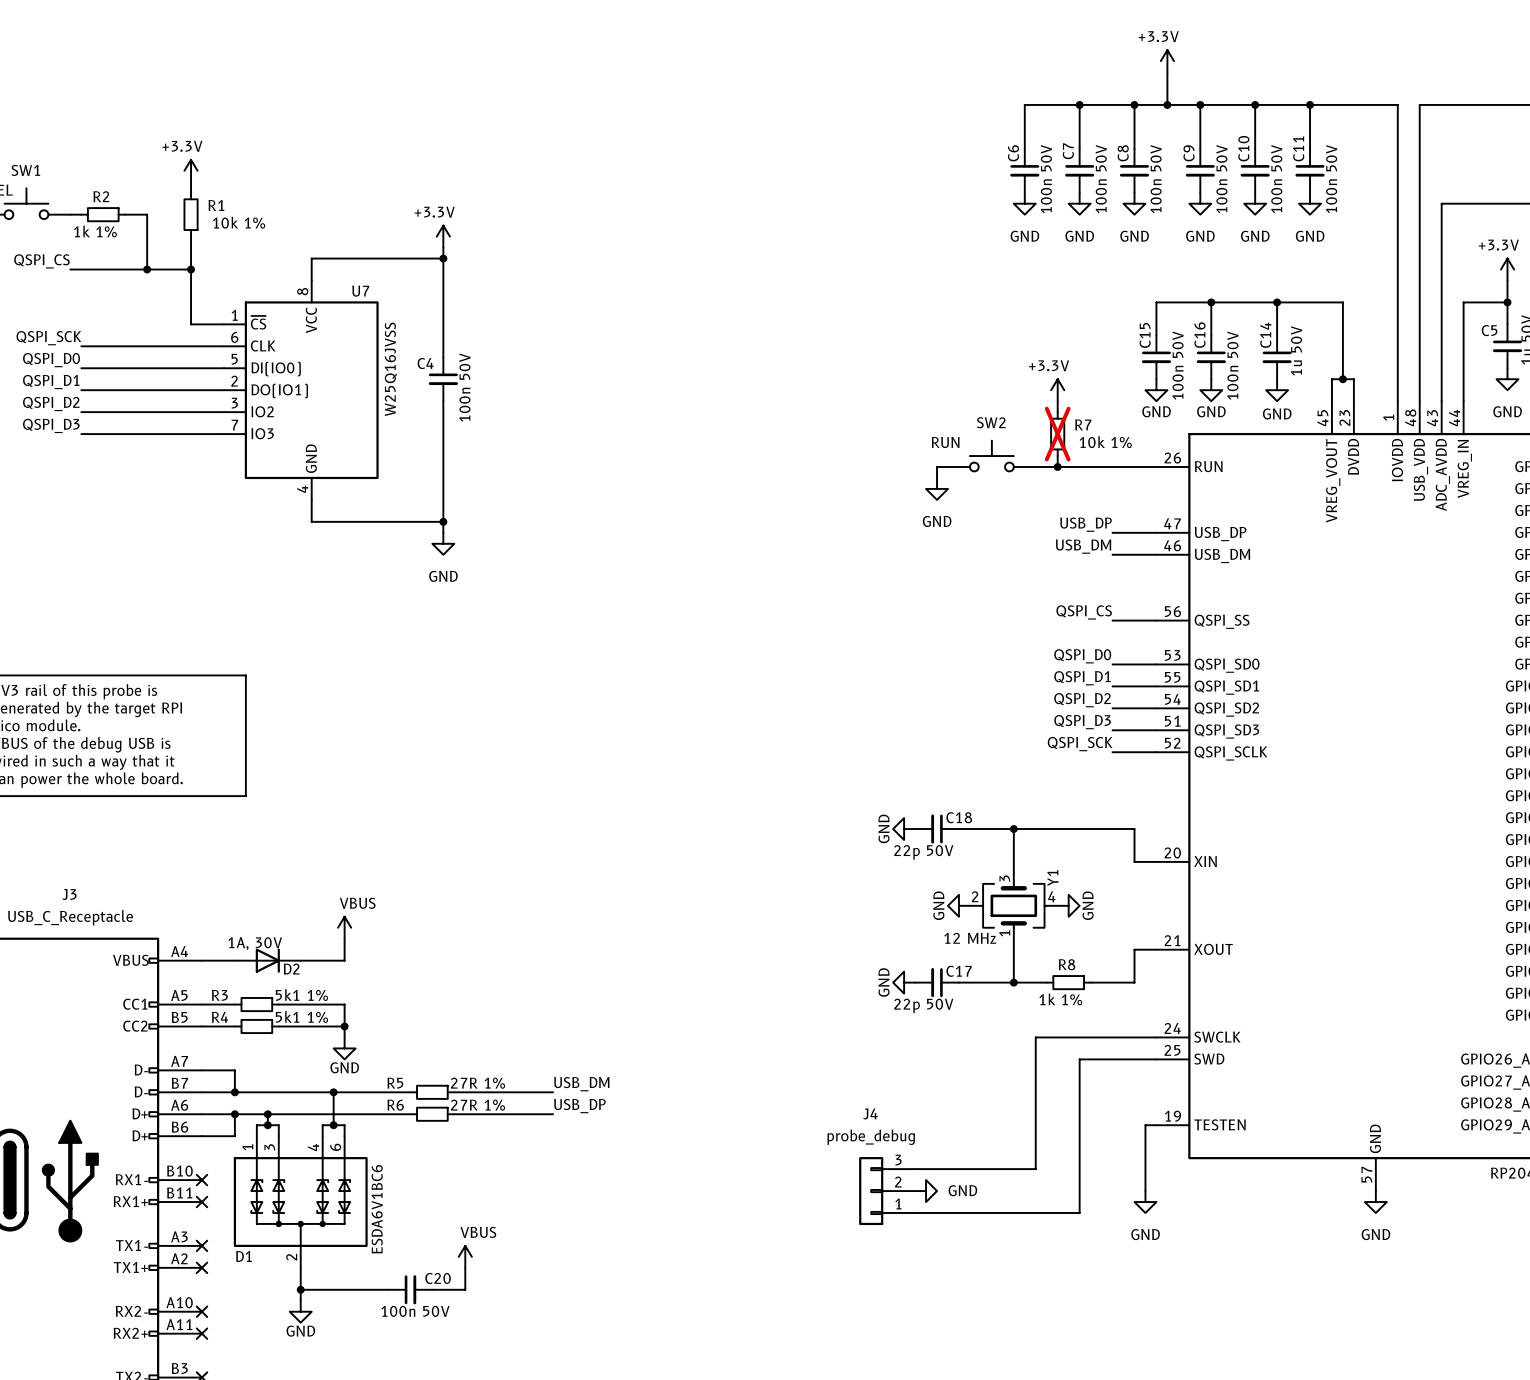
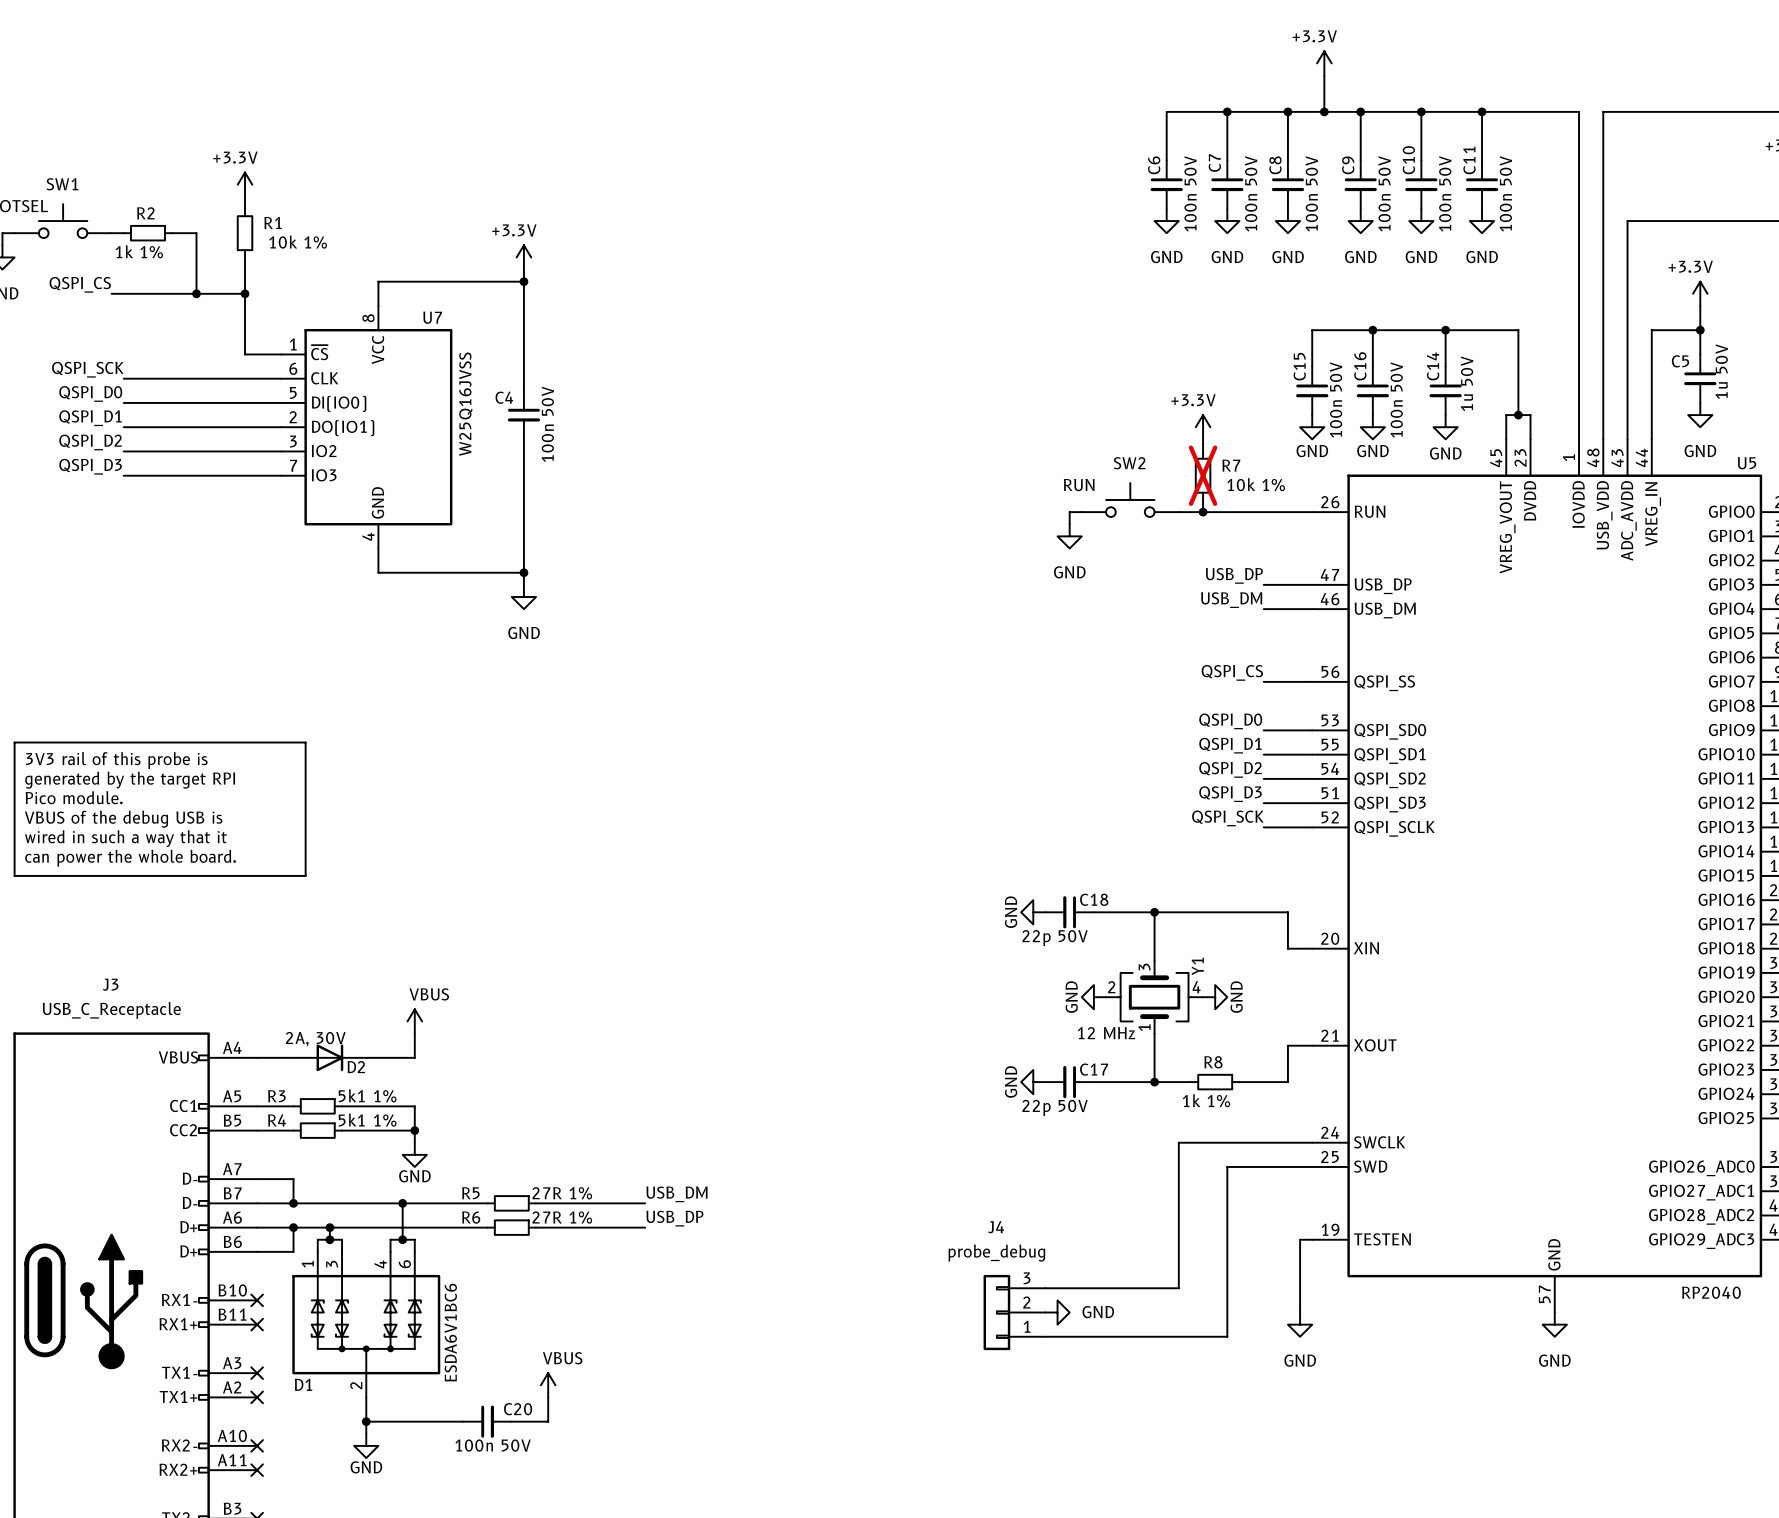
D2 value: 1A, 30V (255, 943) -> 2A, 30V (315, 1039)

